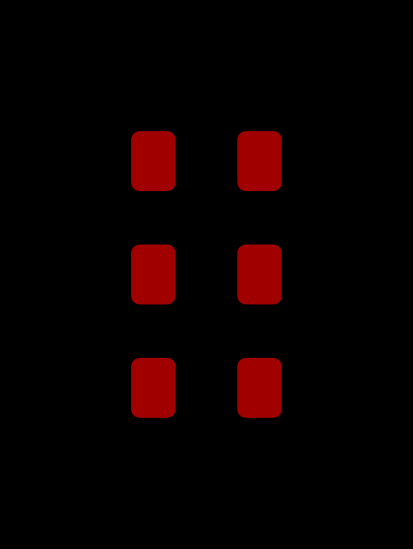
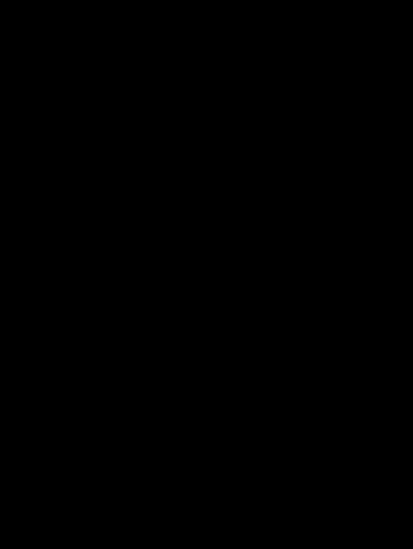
part: (206, 161) -> none
part: (206, 274) -> none
part: (206, 387) -> none

